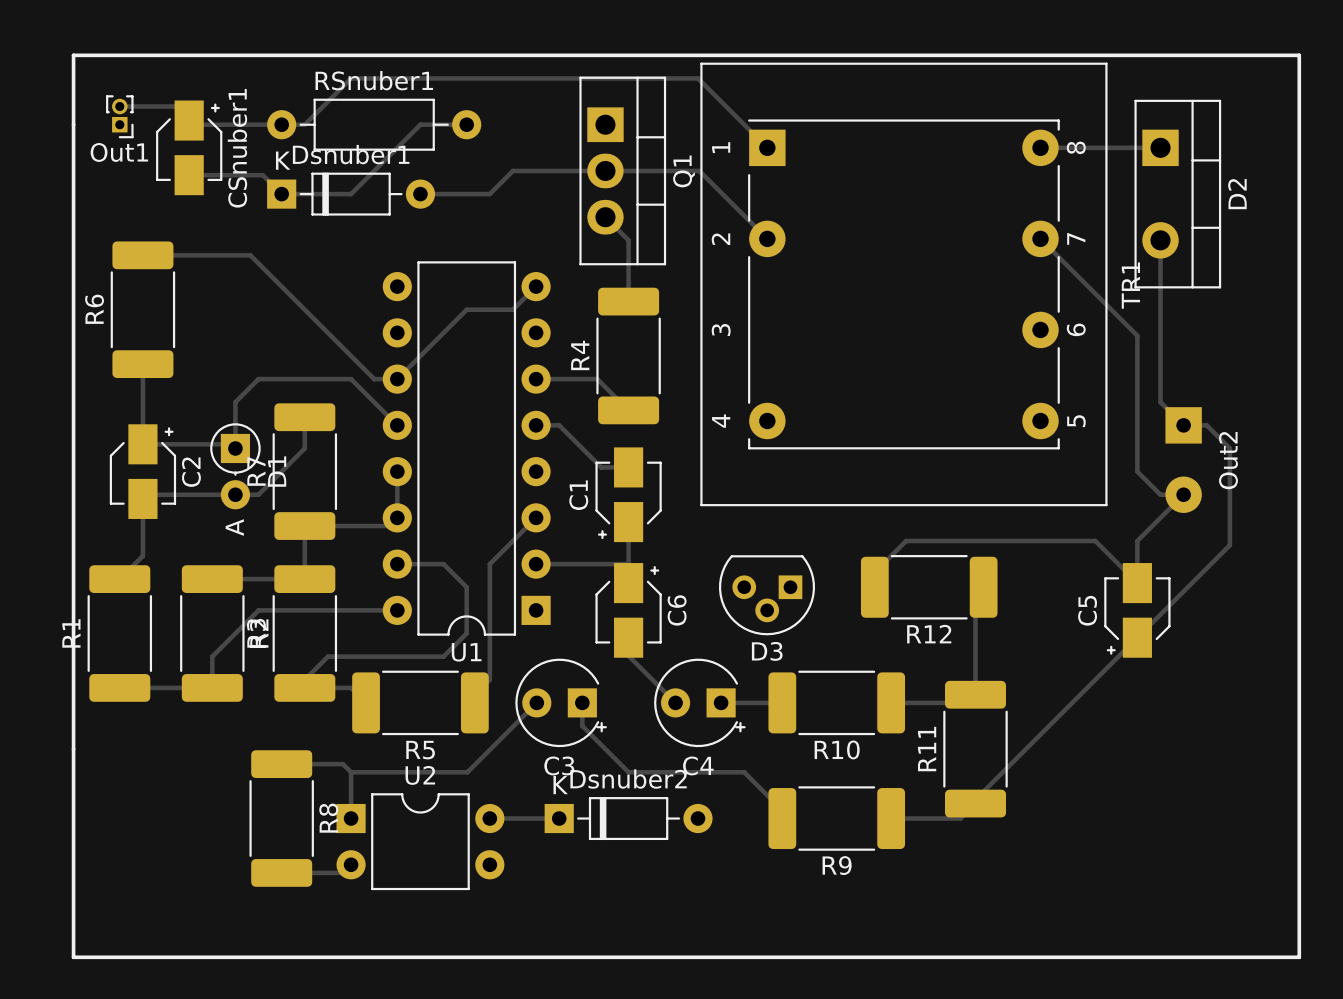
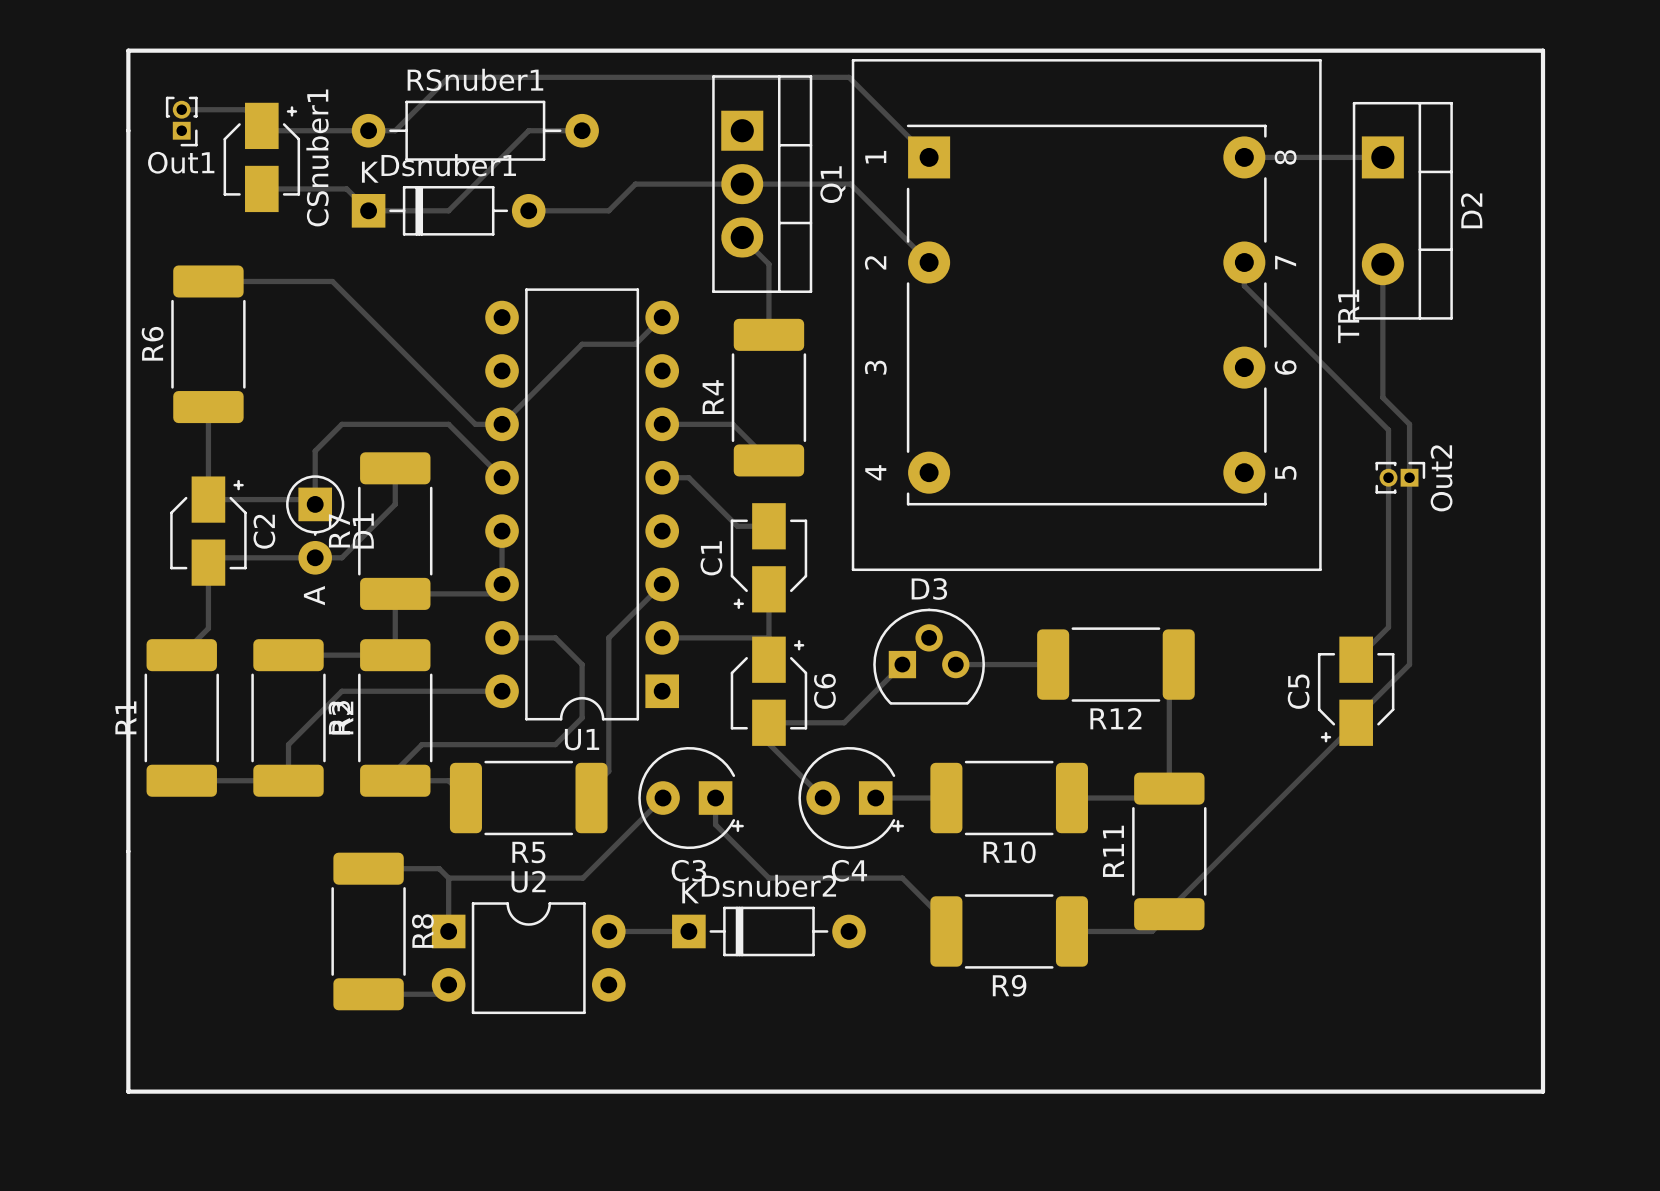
track: (1040, 238) (1137, 335) (1137, 471) (1160, 494) (1183, 494) (1137, 541) (1137, 583) (1095, 541) (906, 541) (874, 572) (874, 587) -> (1244, 262) (1244, 285) (1388, 430) (1388, 627) (1356, 659)
track: (1160, 355) (1160, 402) (1183, 425) (1206, 425) (1229, 448) (1229, 545) (1137, 637) -> (1382, 397) (1409, 424) (1409, 664) (1356, 717) (1356, 722)
Out2 footprint: [1165, 407, 1202, 513] -> [1375, 461, 1426, 494]
D3 footprint: [718, 555, 816, 636] -> [873, 608, 986, 705]
track: none -> (902, 664) (844, 722) (768, 722)
track: none -> (955, 664) (1053, 664)
D3 name position: D3 (767, 651) -> D3 (929, 588)

